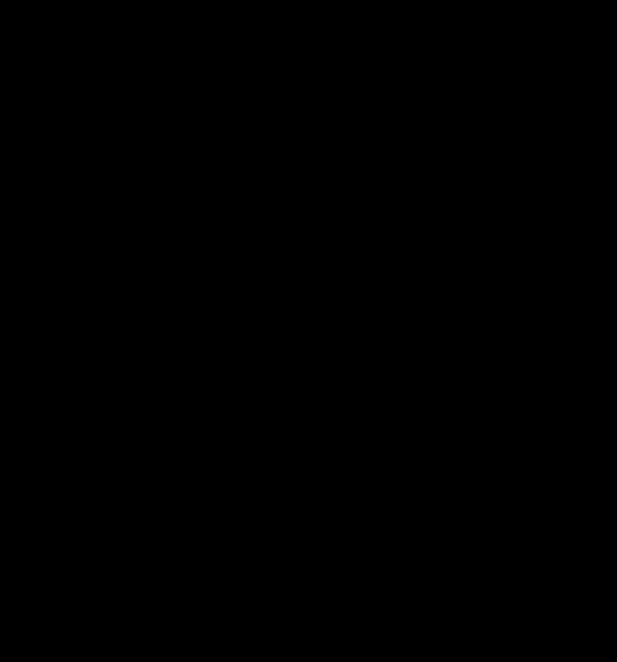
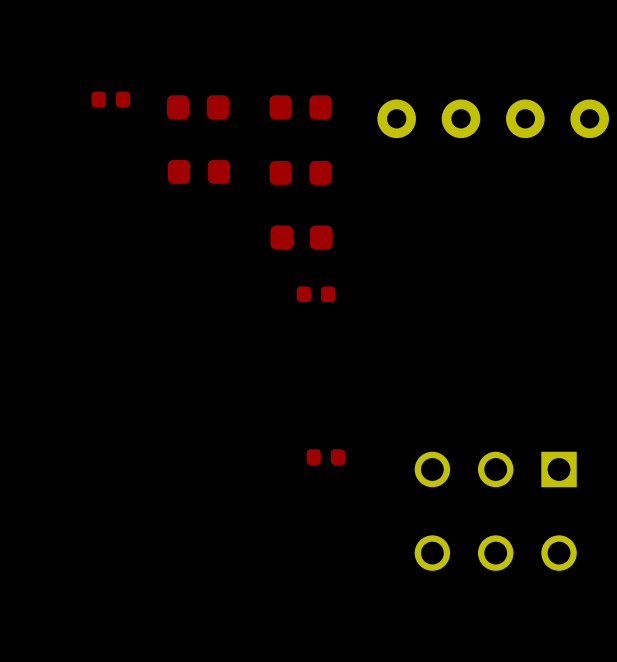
part: none -> (110, 99)
part: none -> (197, 107)
part: none -> (300, 107)
part: none -> (493, 118)
part: none -> (198, 171)
part: none -> (300, 172)
part: none -> (301, 237)
part: none -> (315, 294)
part: none -> (325, 457)
part: none -> (495, 511)

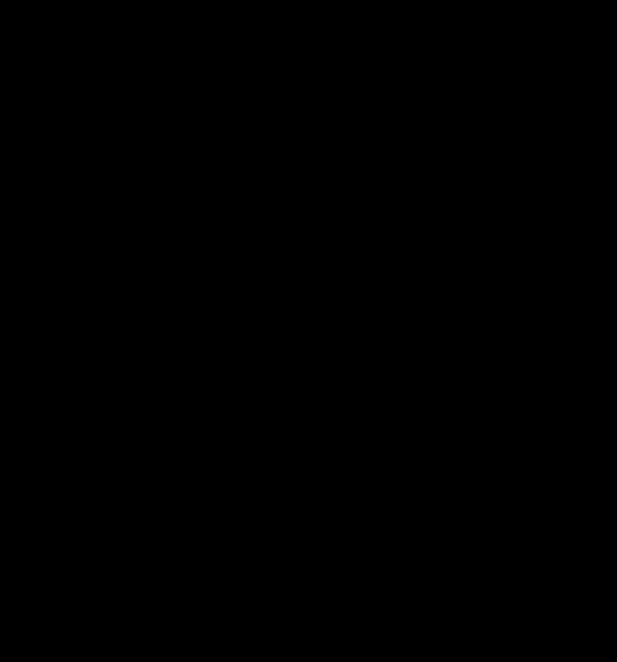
part: (110, 99) -> none
part: (197, 107) -> none
part: (300, 107) -> none
part: (493, 118) -> none
part: (198, 171) -> none
part: (300, 172) -> none
part: (301, 237) -> none
part: (315, 294) -> none
part: (325, 457) -> none
part: (495, 511) -> none

